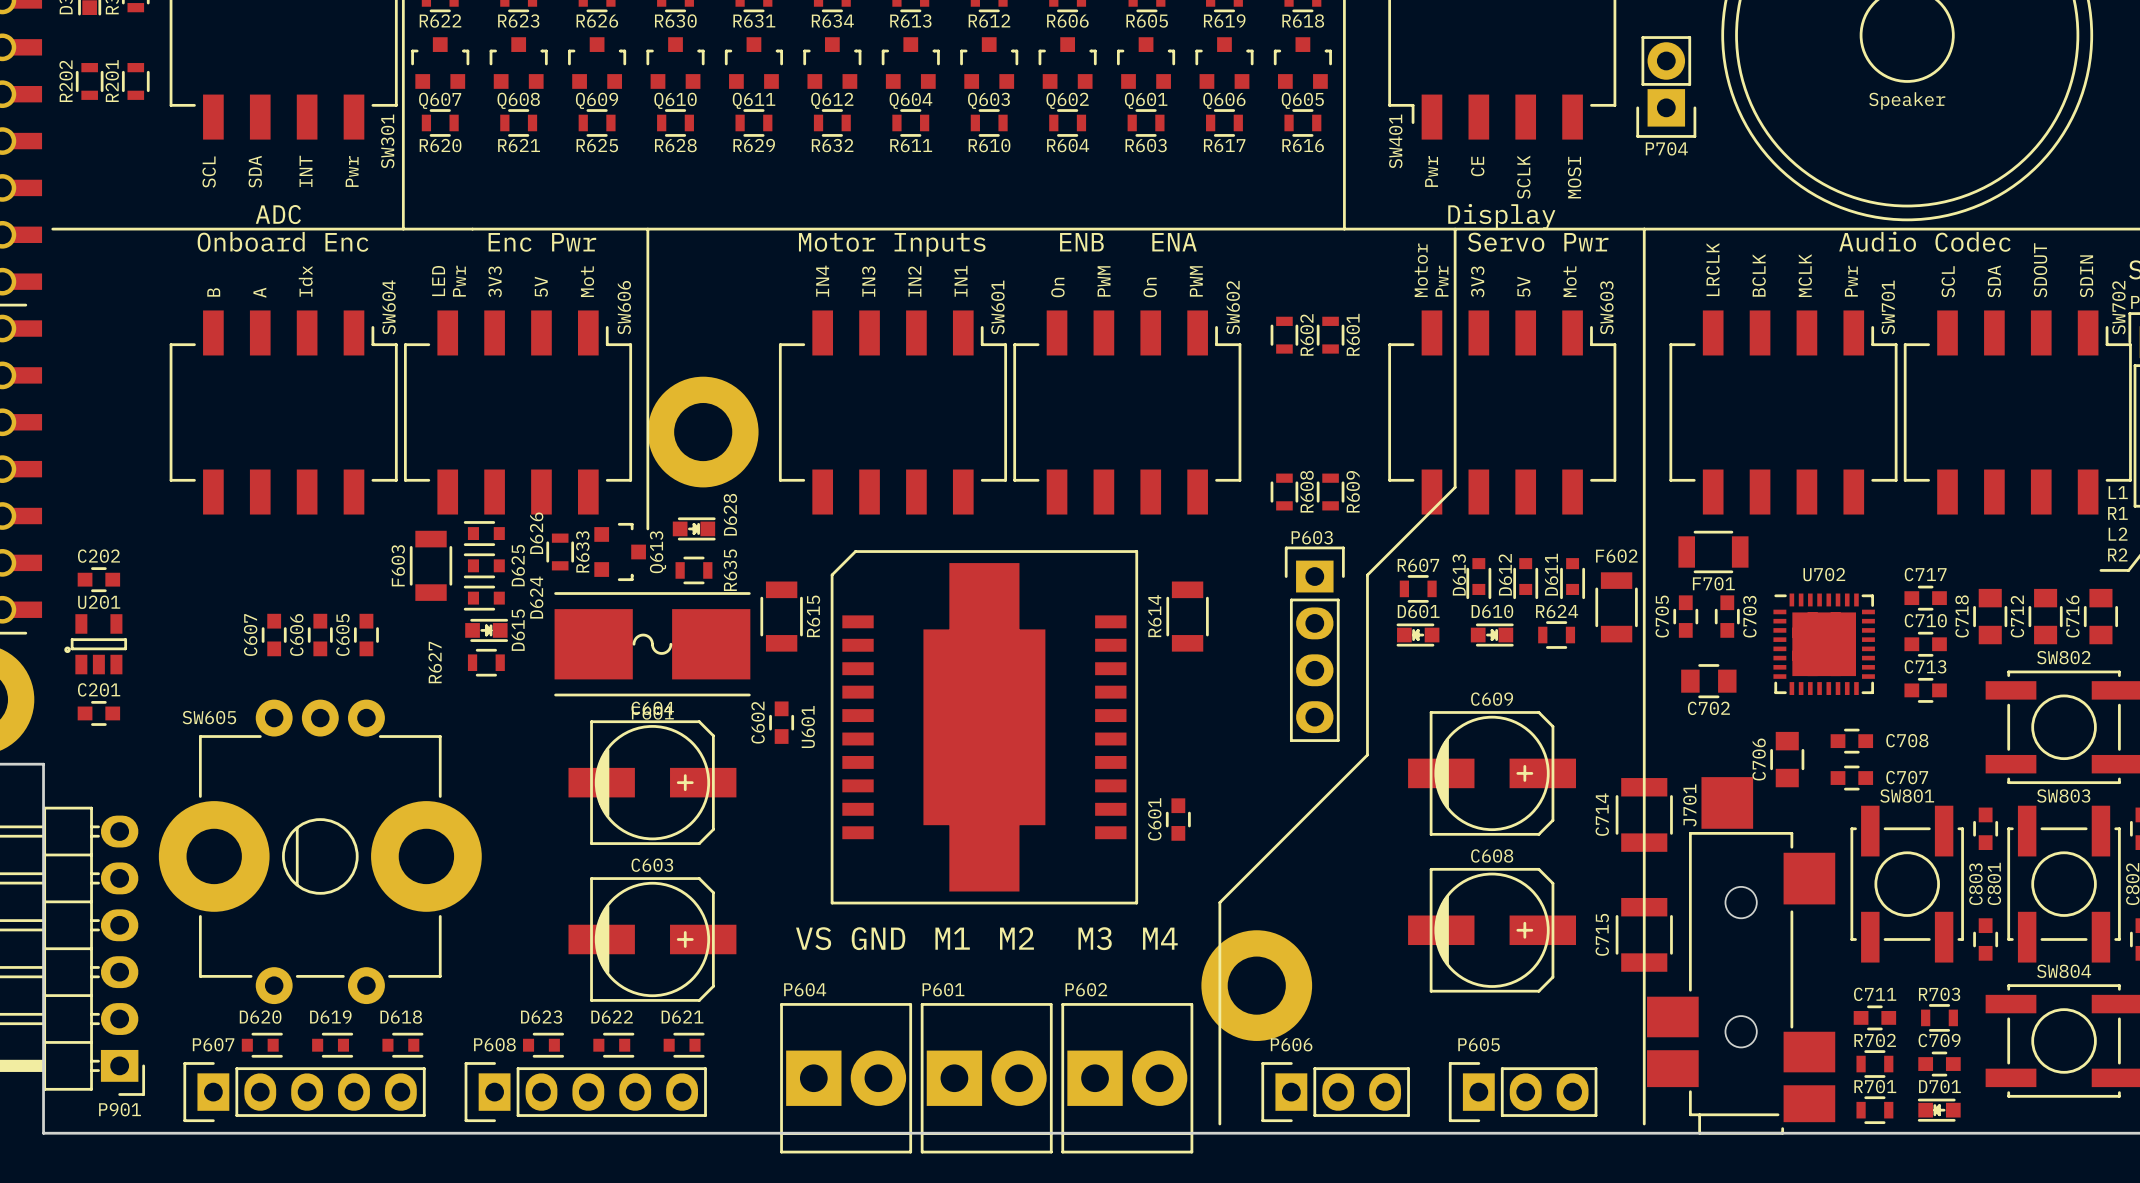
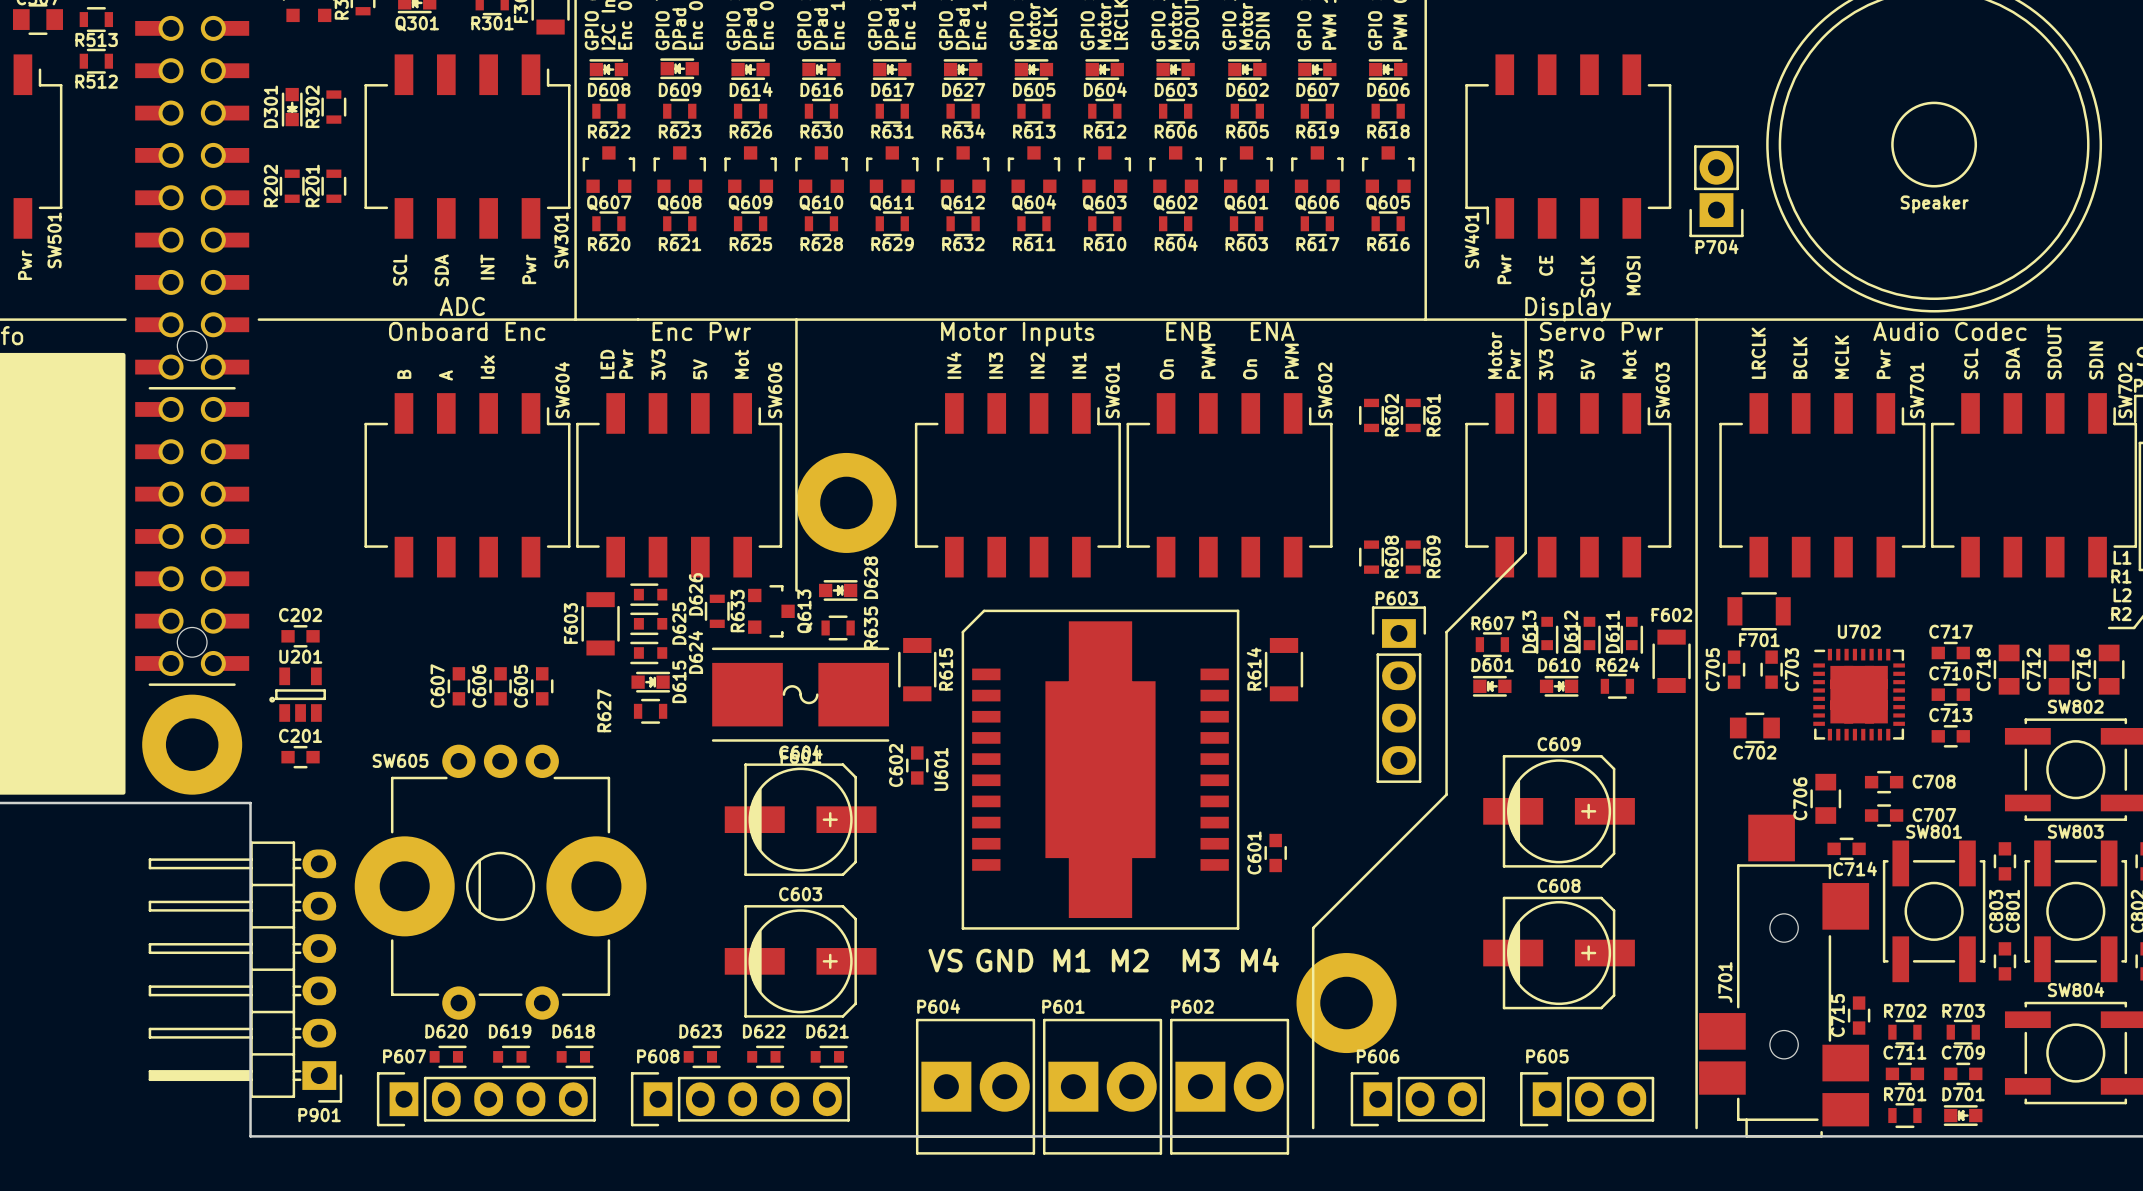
C714 footprint: [1615, 778, 1673, 852] -> [1827, 837, 1866, 861]
J701 name position: J701 (1689, 805) -> J701 (1725, 982)
C714 name position: C714 (1602, 814) -> C714 (1855, 868)
C715 footprint: [1615, 897, 1673, 972] -> [1847, 996, 1871, 1035]
C711 position: (1874, 1017) -> (1904, 1073)
R702 position: (1874, 1064) -> (1904, 1032)

